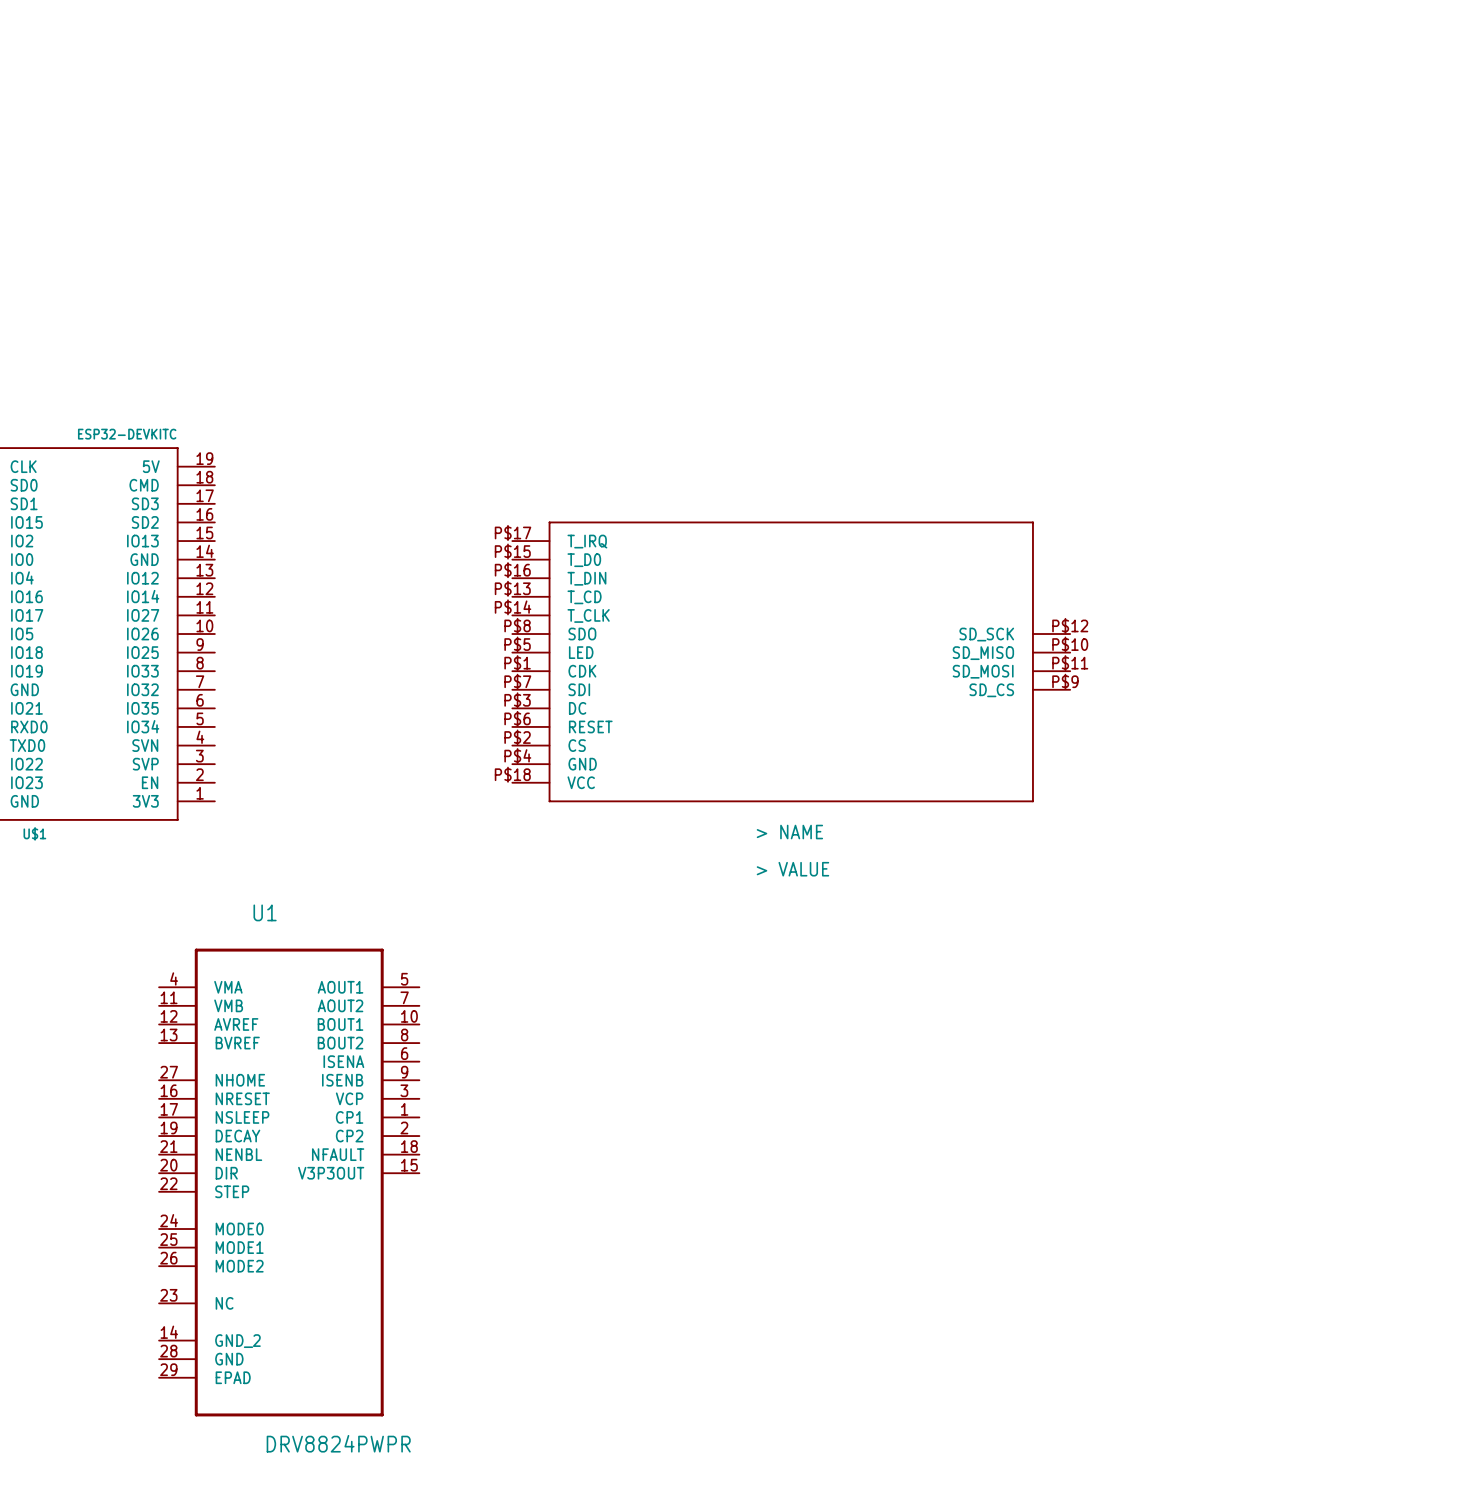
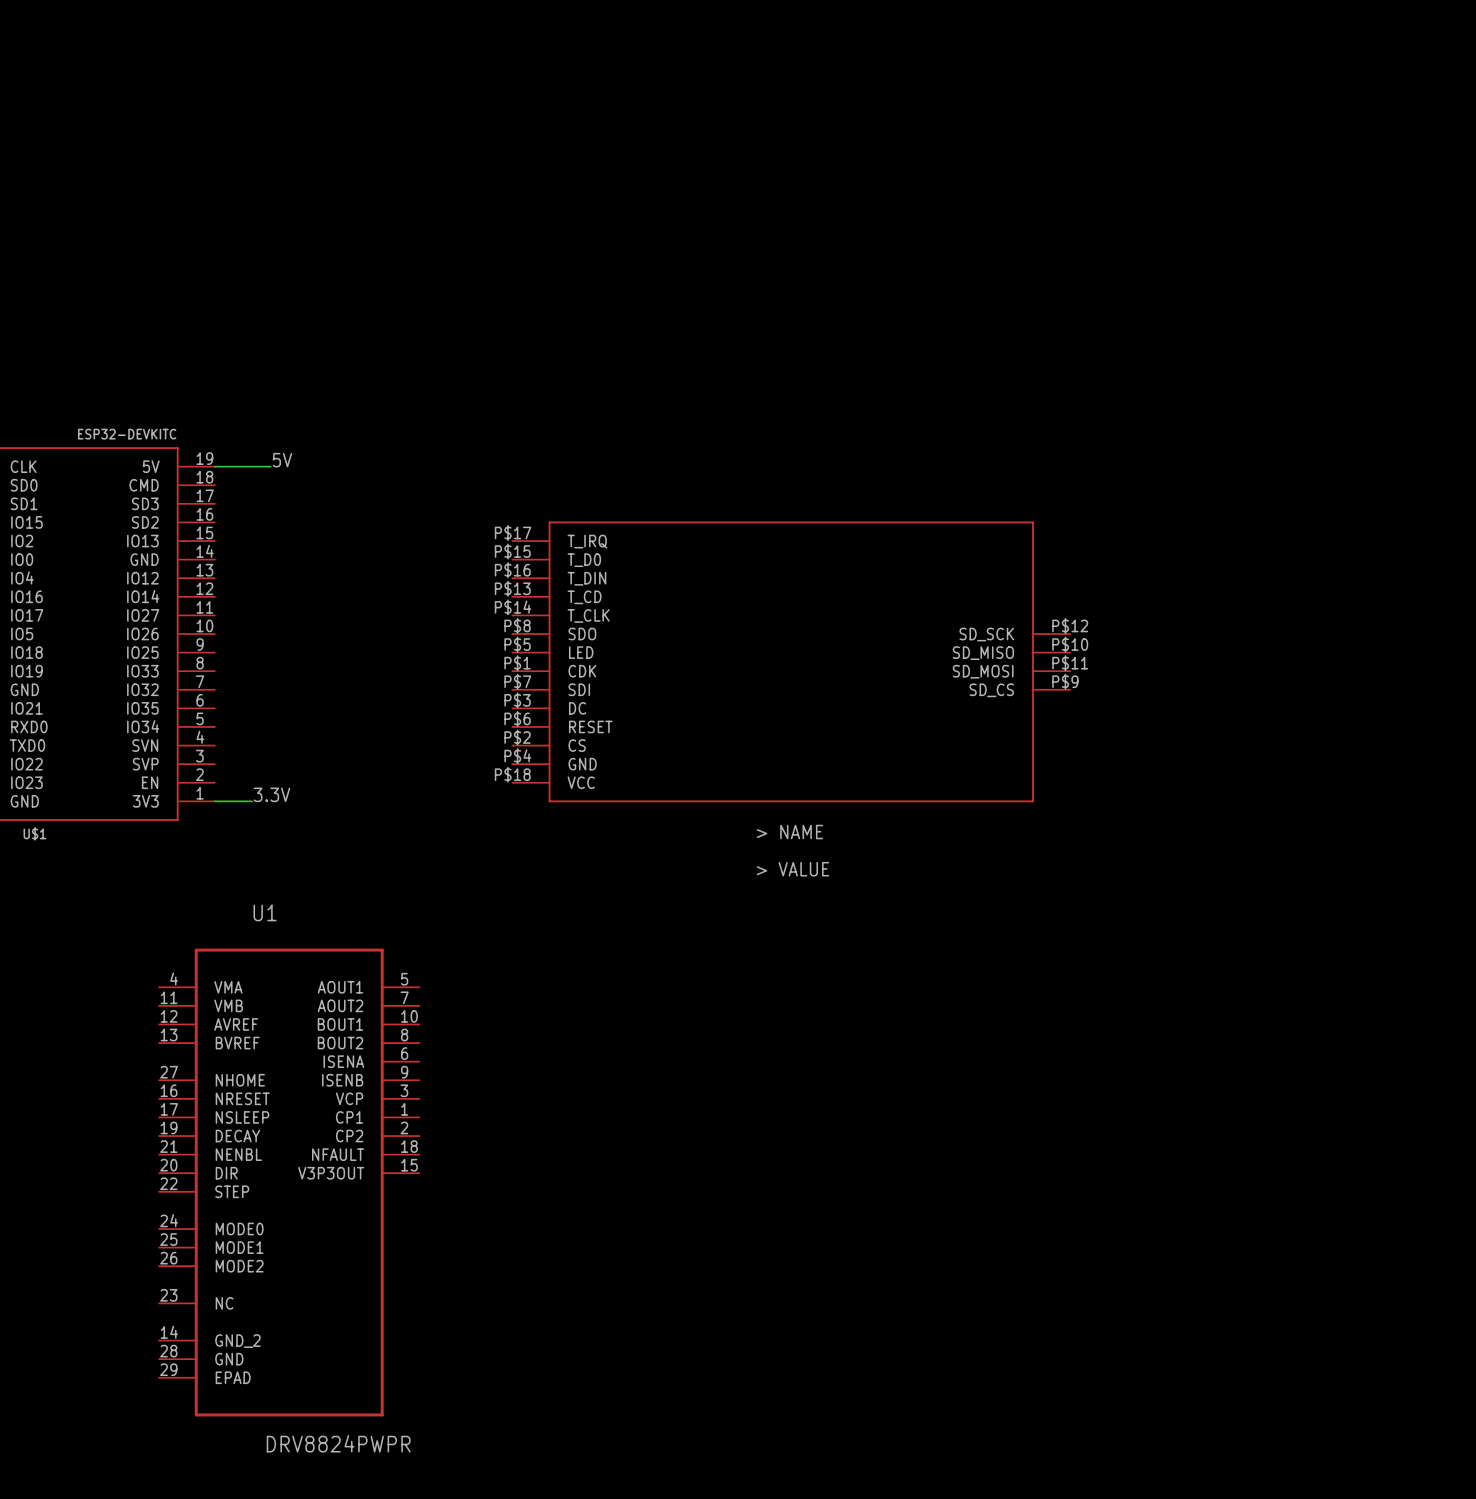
label: none -> 5V (282, 460)
wire: none -> (214, 466) (270, 466)
label: none -> 3.3V (271, 794)
wire: none -> (214, 801) (252, 801)

